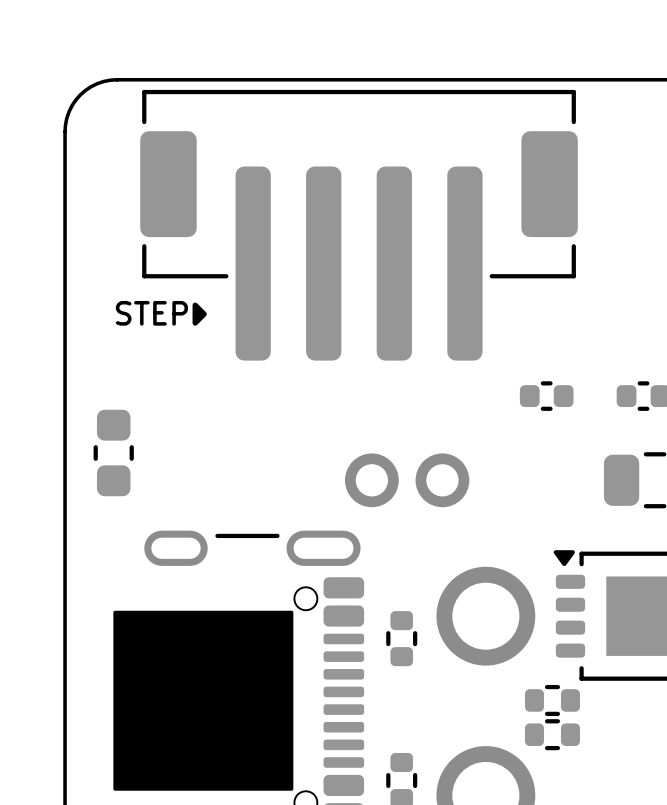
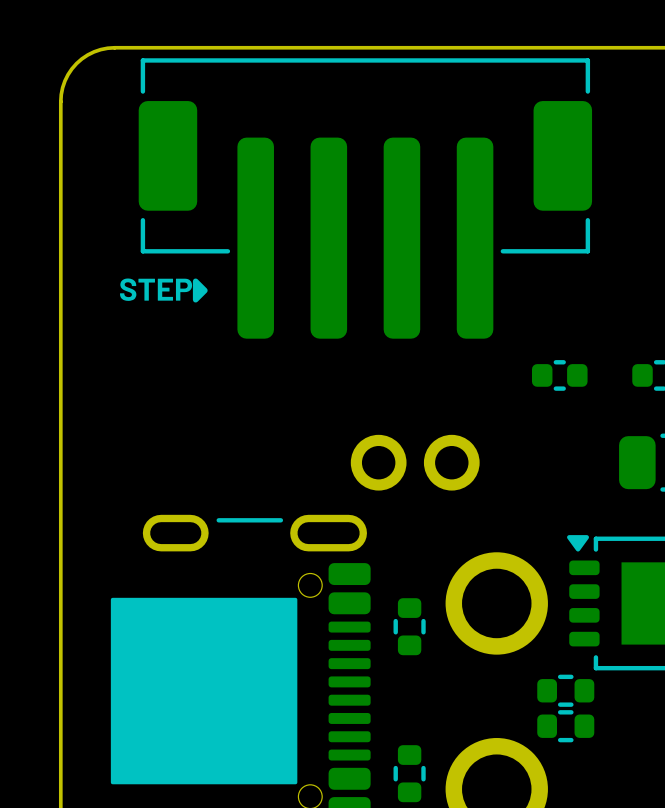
part: (113, 452) -> none

